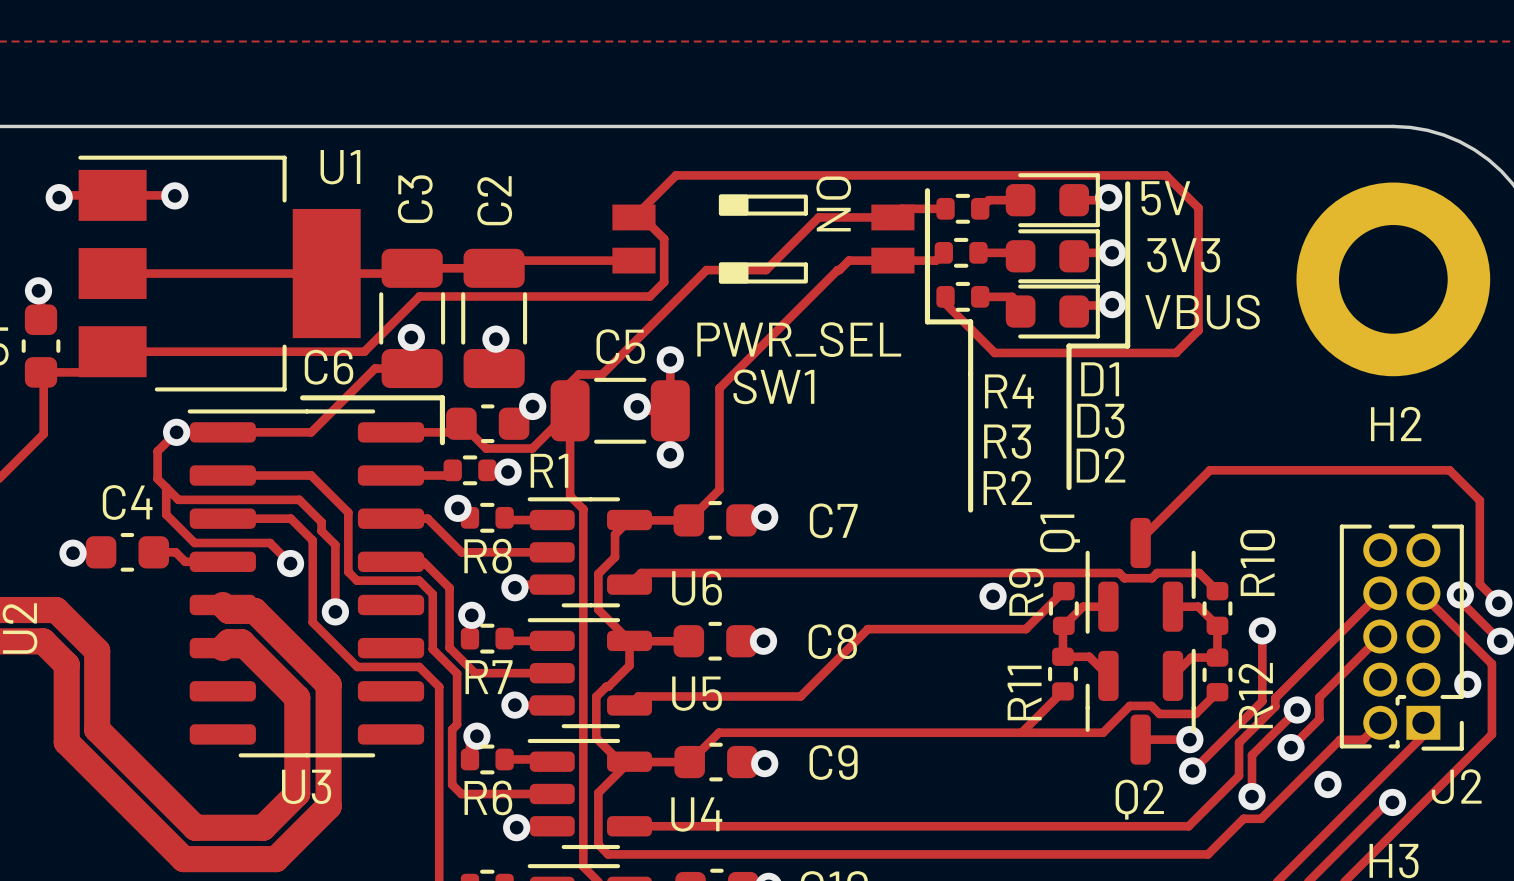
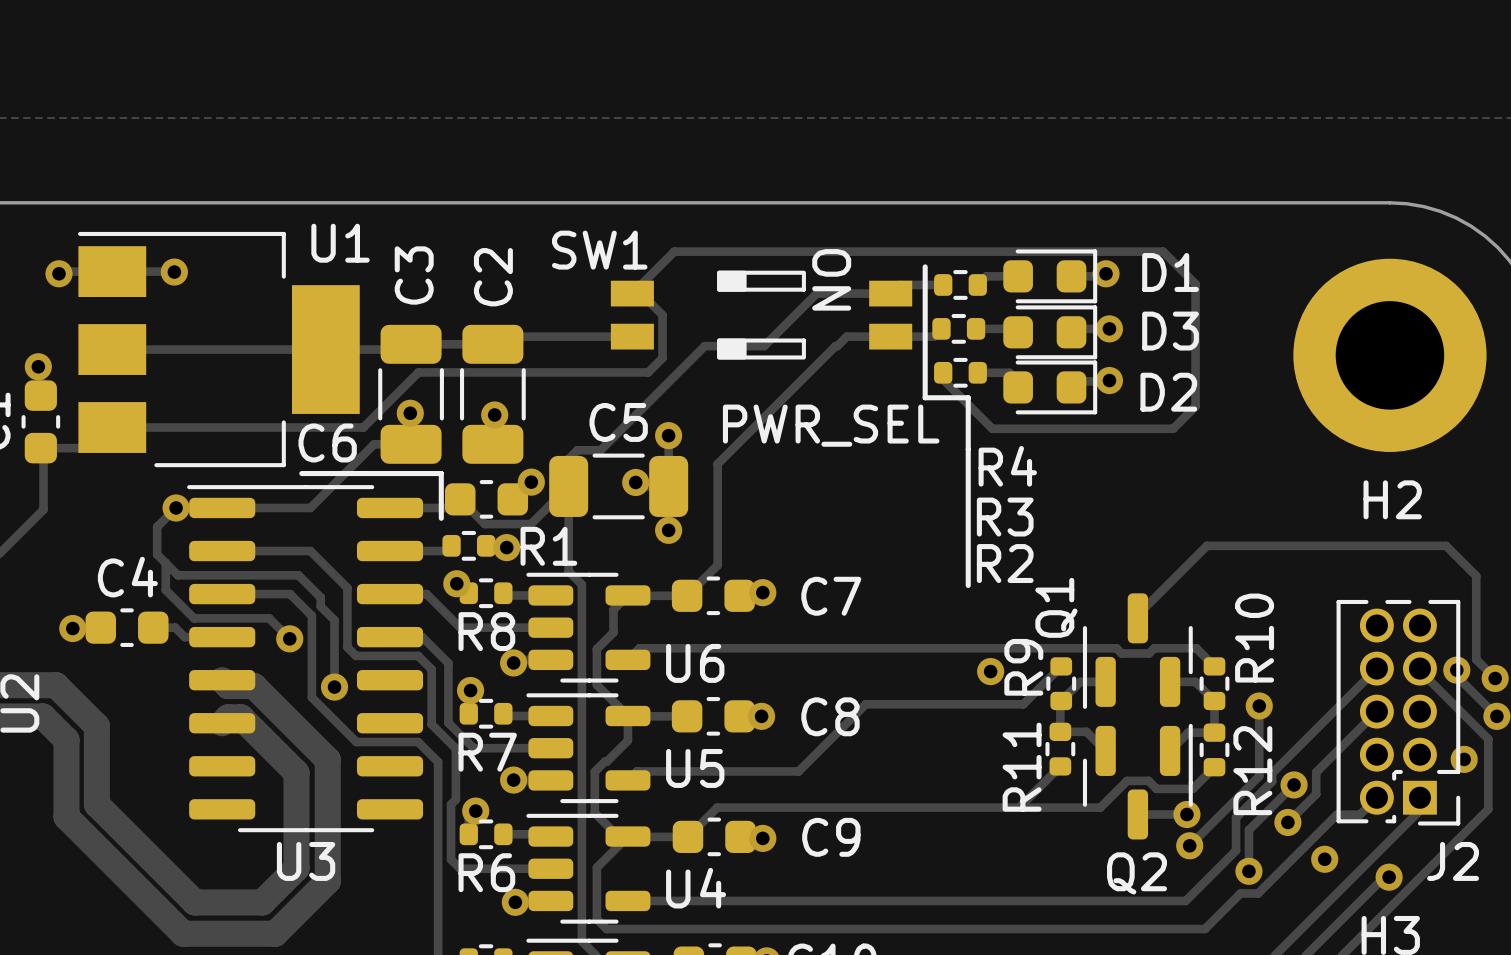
line: (1127, 183) (1127, 346) (1069, 346) (1069, 487) -> none
text: 5V (1165, 198) -> none
text: 3V3 (1183, 255) -> none
text: VBUS (1202, 312) -> none
SW1 text position: PWR_SEL (799, 339) -> PWR_SEL (831, 425)
D1 name position: D1 (1100, 379) -> D1 (1170, 272)
SW1 name position: SW1 (773, 386) -> SW1 (599, 250)
D3 name position: D3 (1100, 420) -> D3 (1170, 331)
D2 name position: D2 (1100, 465) -> D2 (1168, 392)

